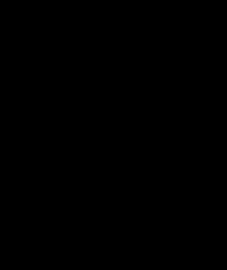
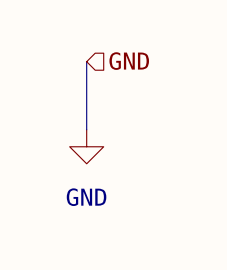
wire: none -> (86, 61) (86, 129)
hierarchical label: none -> GND (129, 61)
power symbol: none -> GND (86, 146)

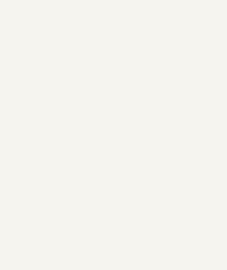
wire: (86, 61) (86, 129) -> none
hierarchical label: GND (129, 61) -> none
power symbol: GND (86, 146) -> none

